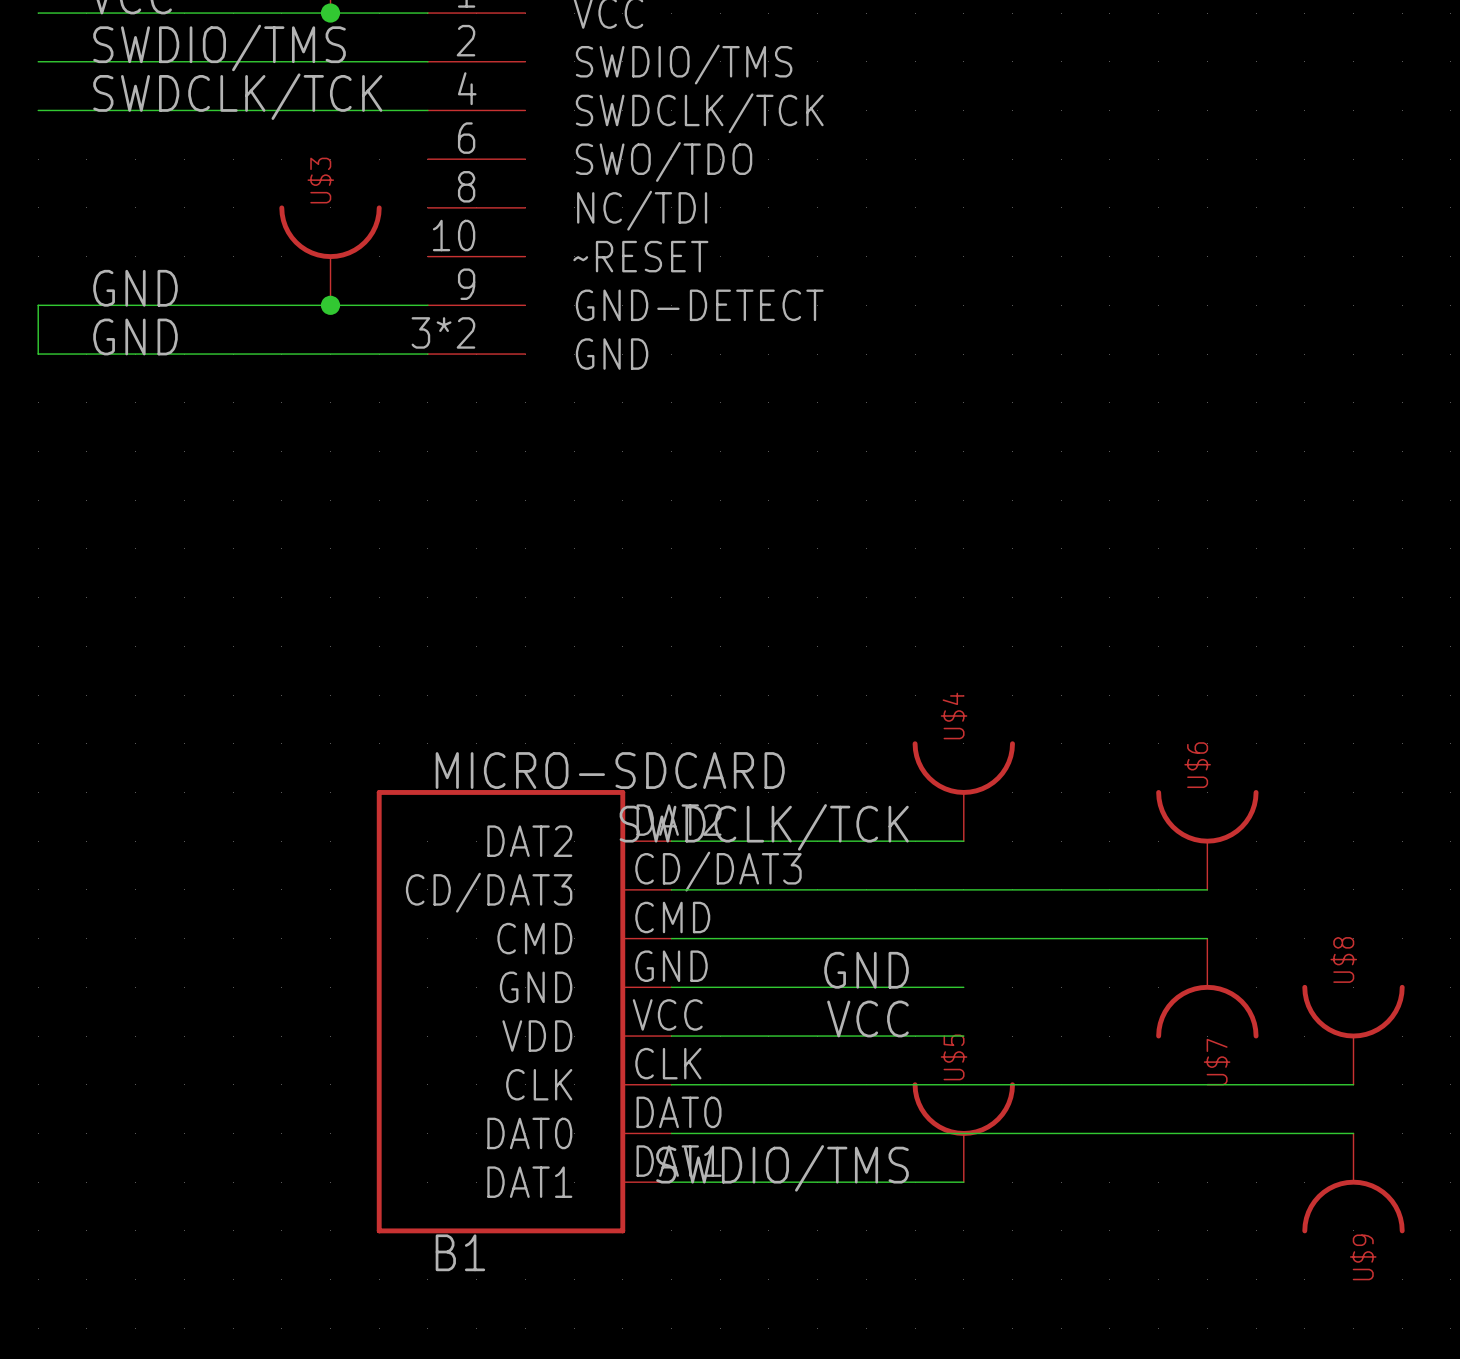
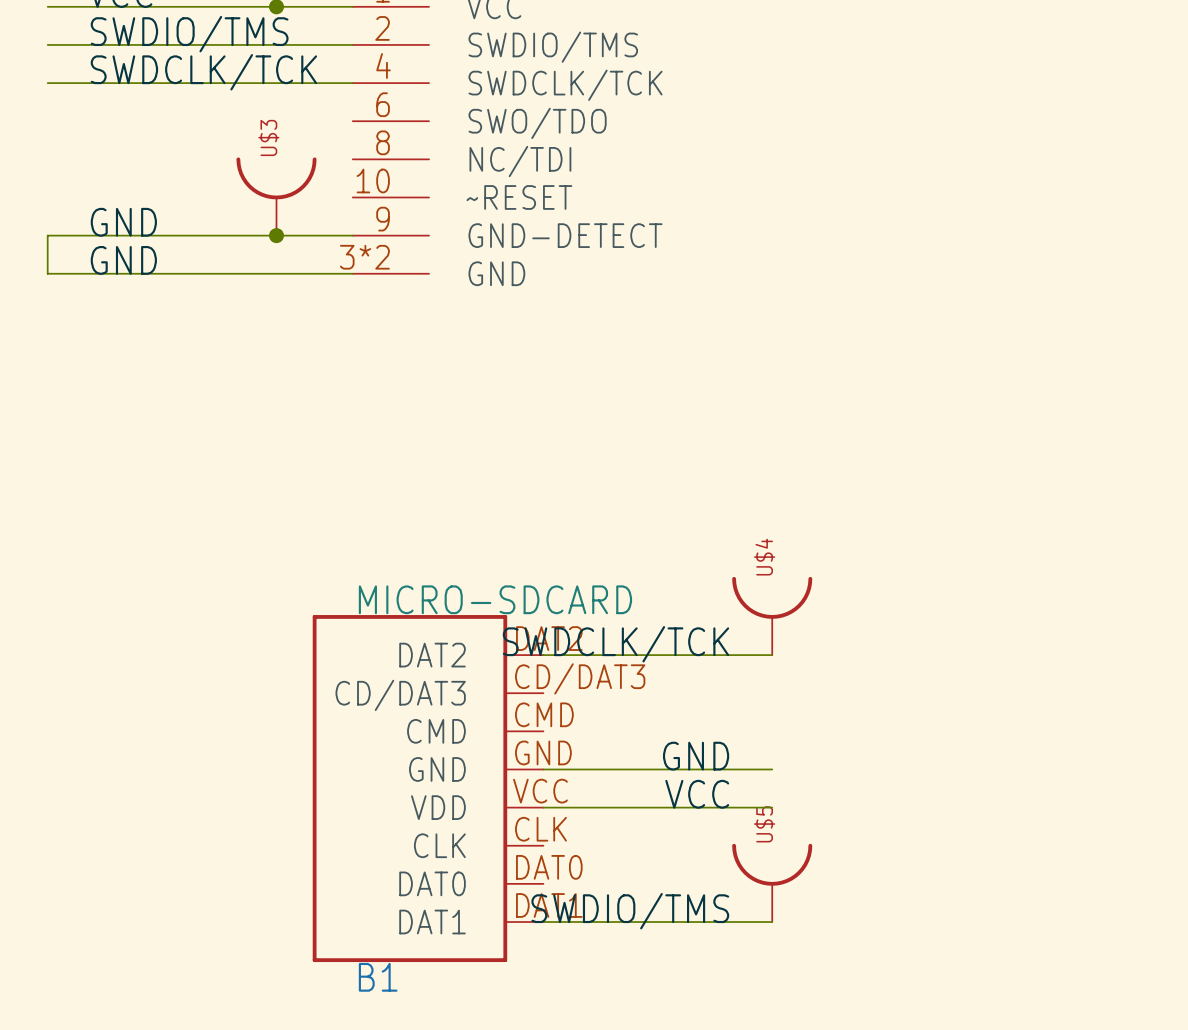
U$6: (1207, 839) -> none
wire: (671, 889) (1207, 889) -> none
wire: (671, 938) (1207, 938) -> none
U$7: (1207, 988) -> none
U$8: (1353, 1034) -> none
wire: (671, 1084) (1353, 1084) -> none
wire: (671, 1133) (1353, 1133) -> none
U$9: (1353, 1183) -> none

